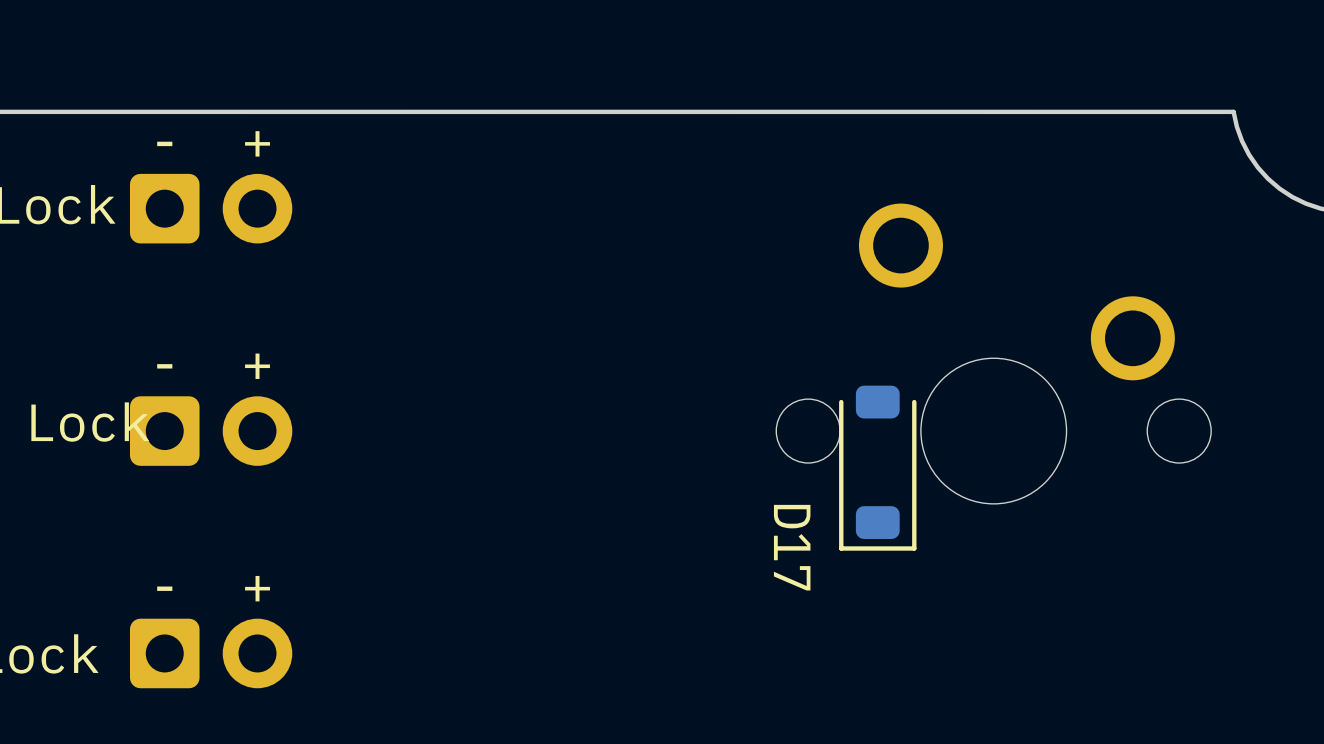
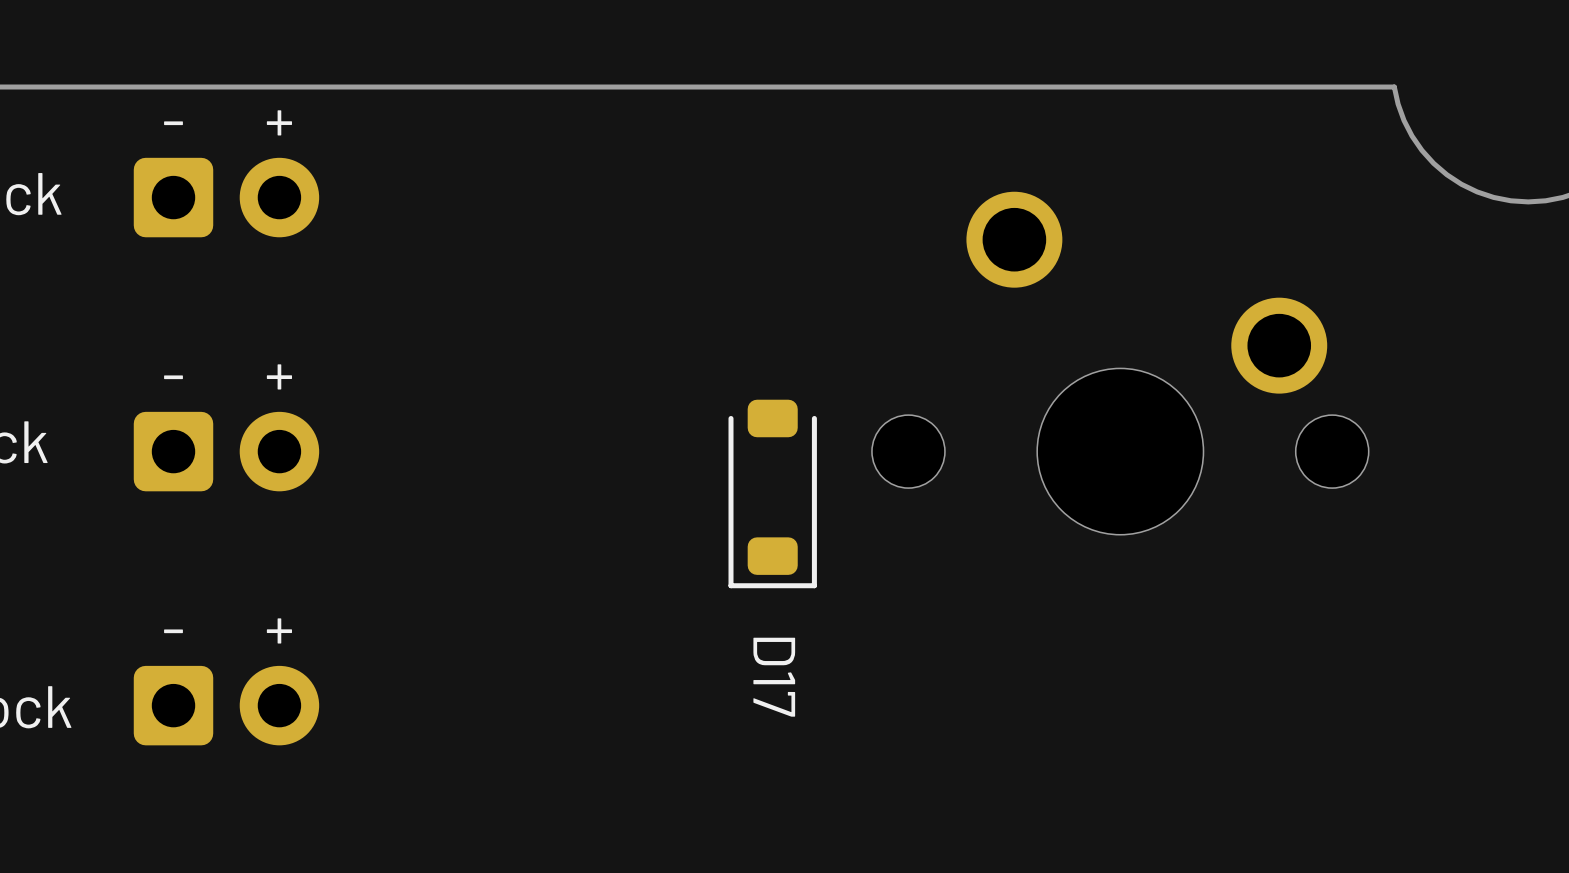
D17 position: (877, 468) -> (772, 493)
D17 name position: D17 (792, 547) -> D17 (774, 677)

